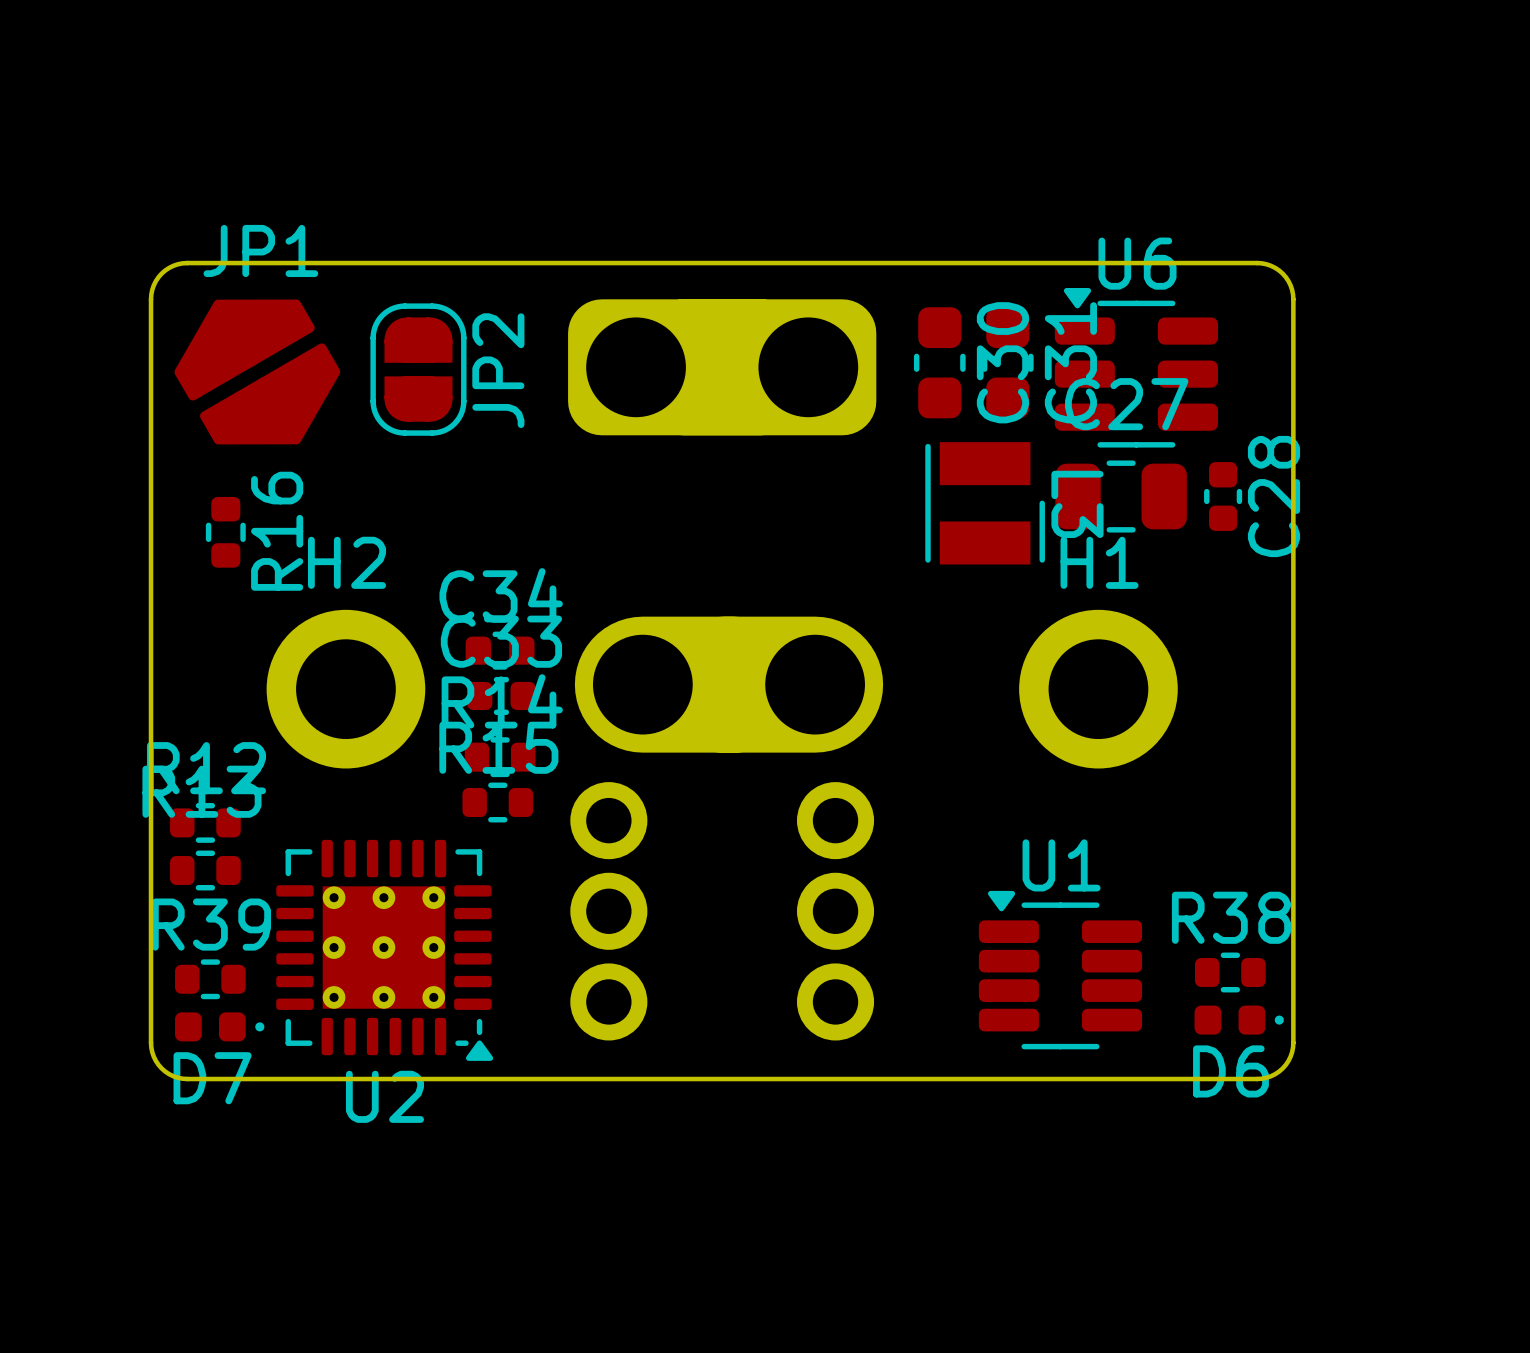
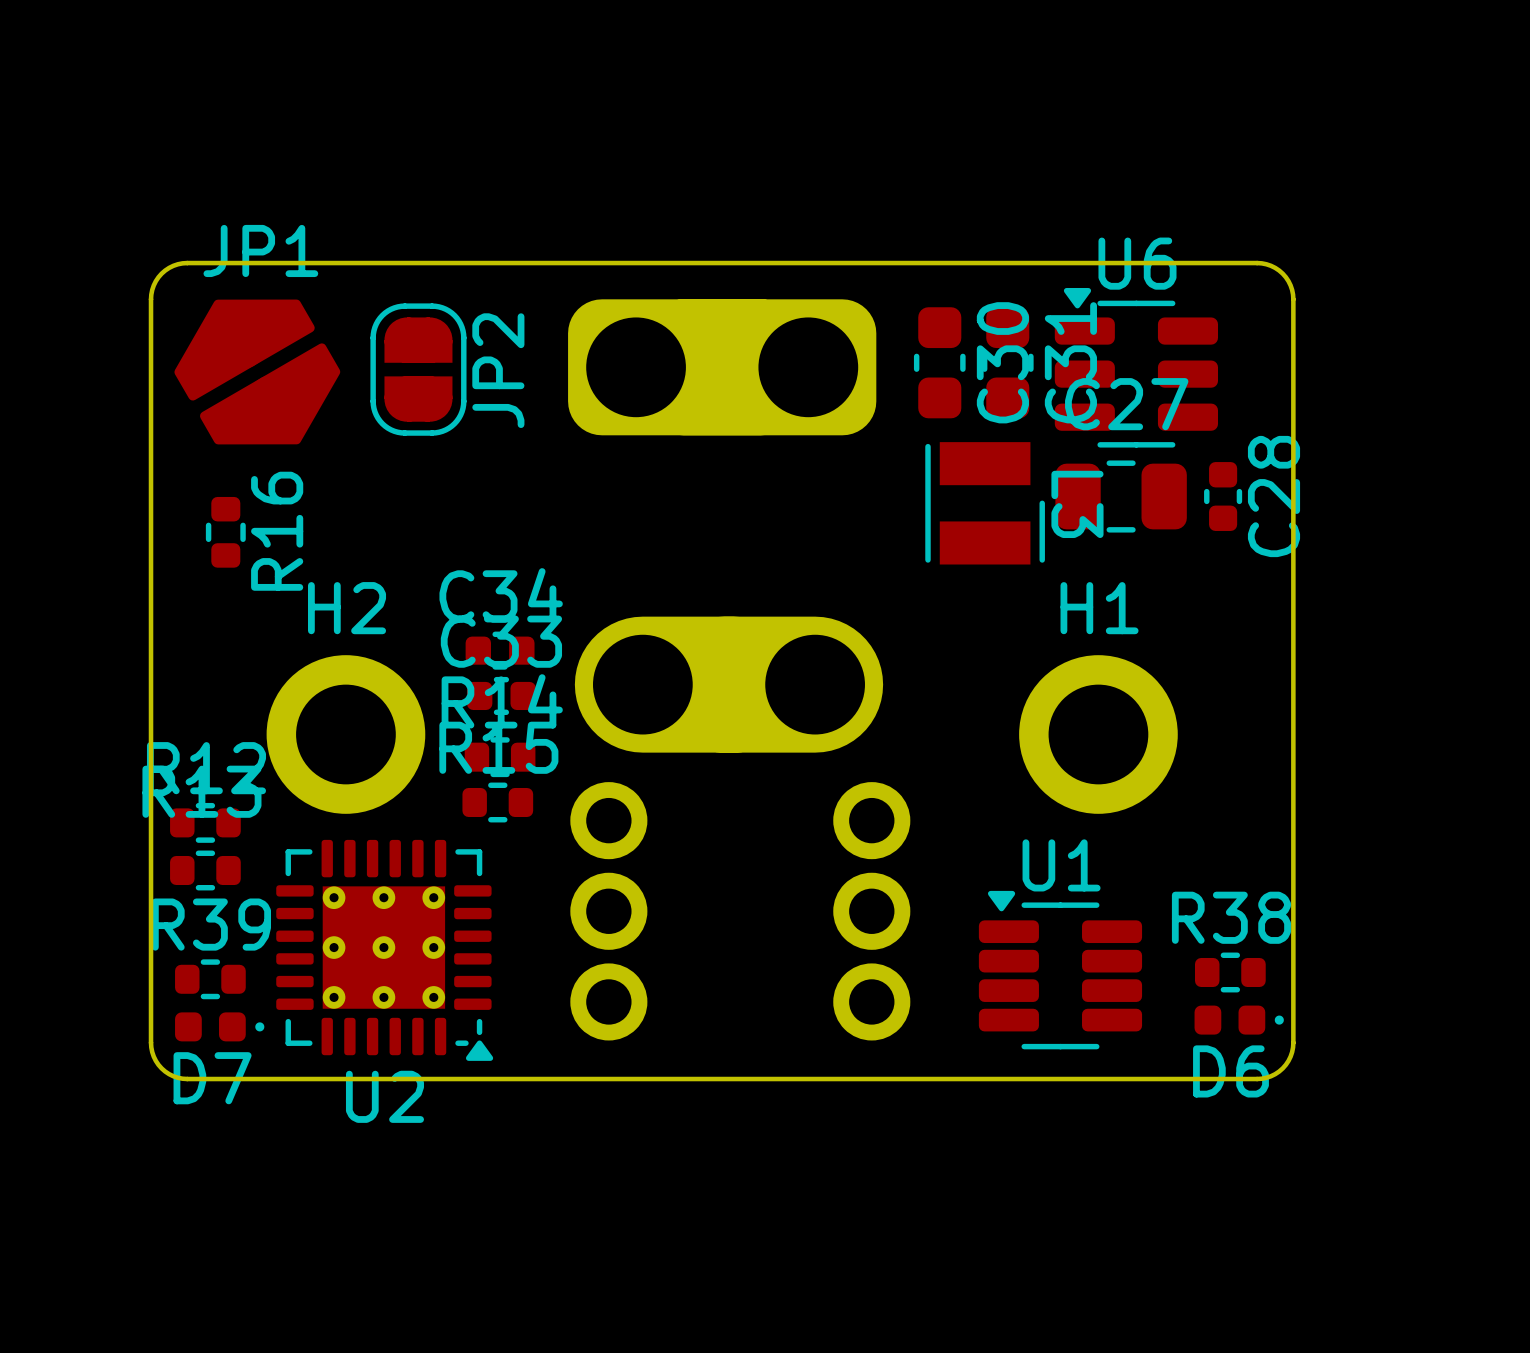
H2 position: (345, 689) -> (345, 734)
H1 position: (1098, 689) -> (1098, 734)
part position: (835, 911) -> (871, 911)

